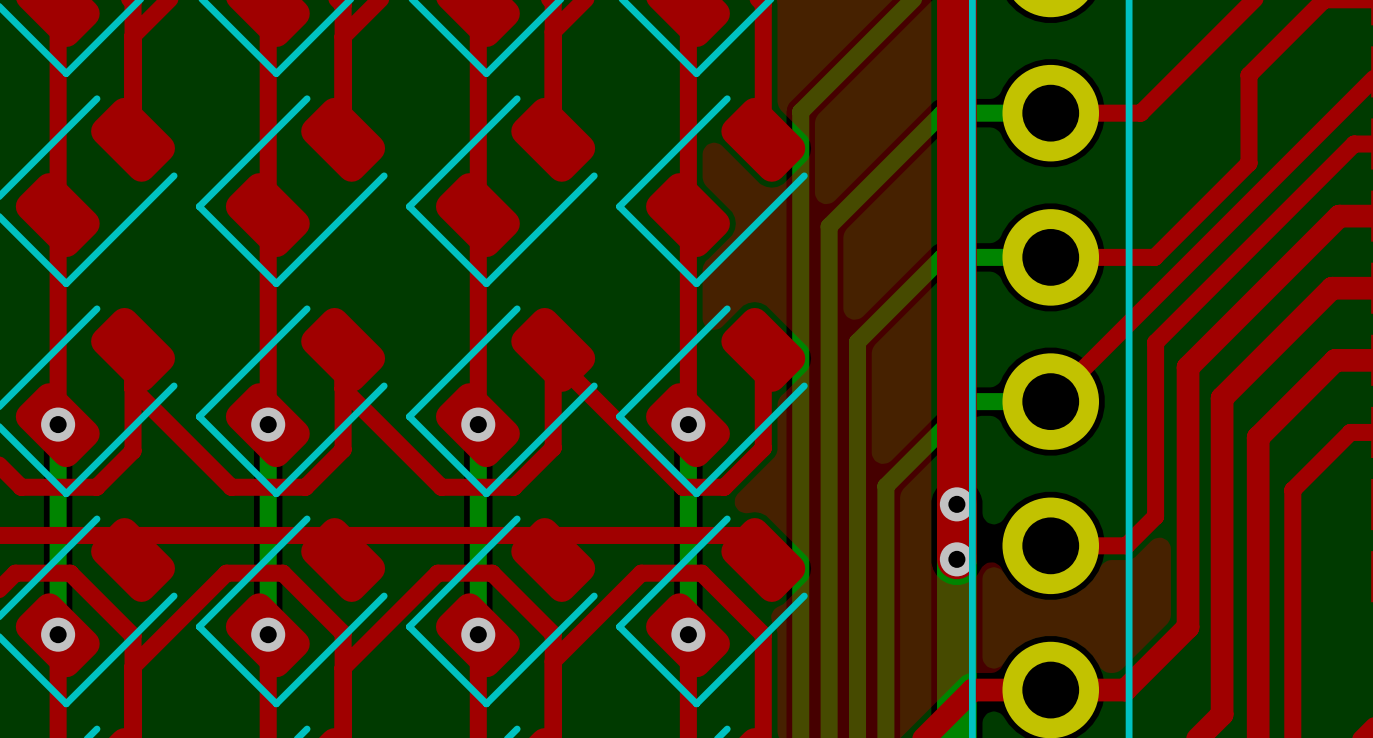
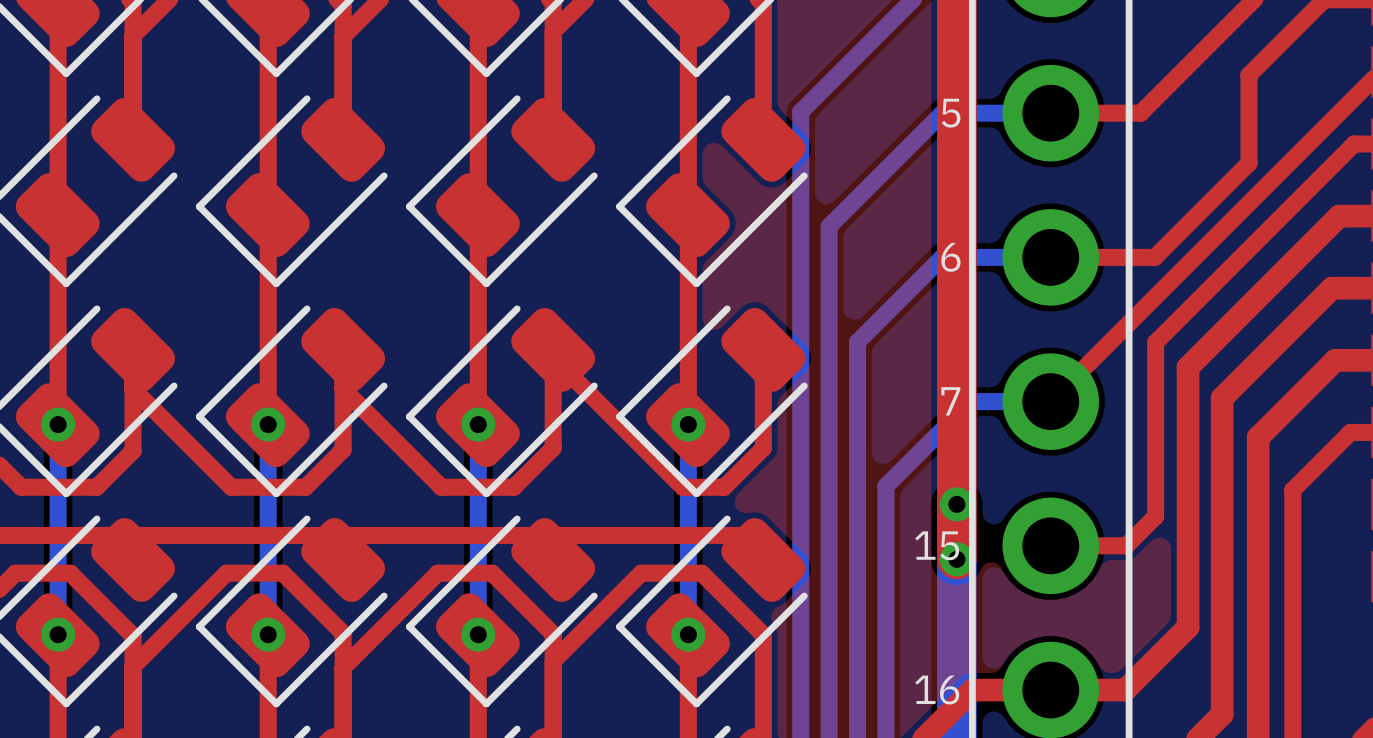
text: none -> 5 (951, 113)
text: none -> 6 (950, 257)
text: none -> 7 (950, 401)
text: none -> 15 (937, 545)
text: none -> 16 (937, 690)

